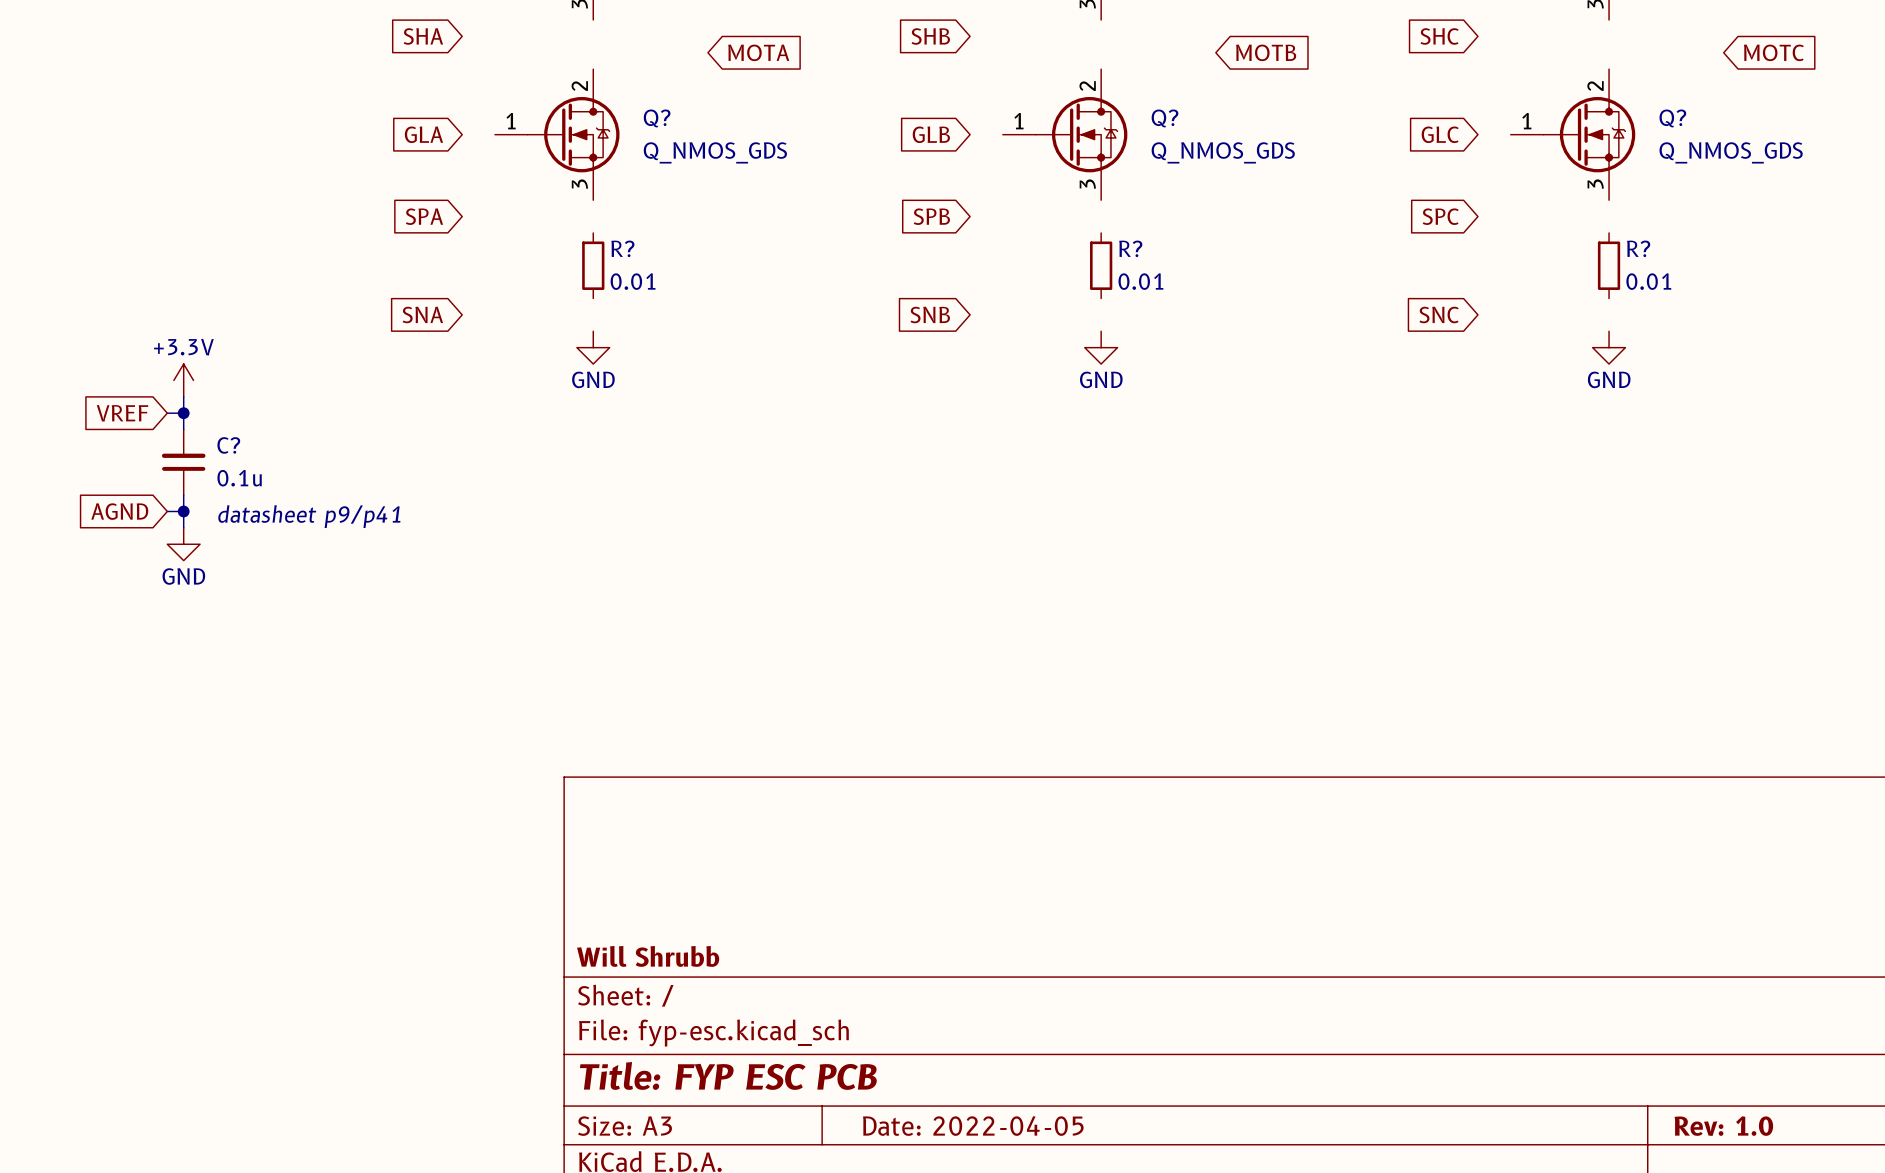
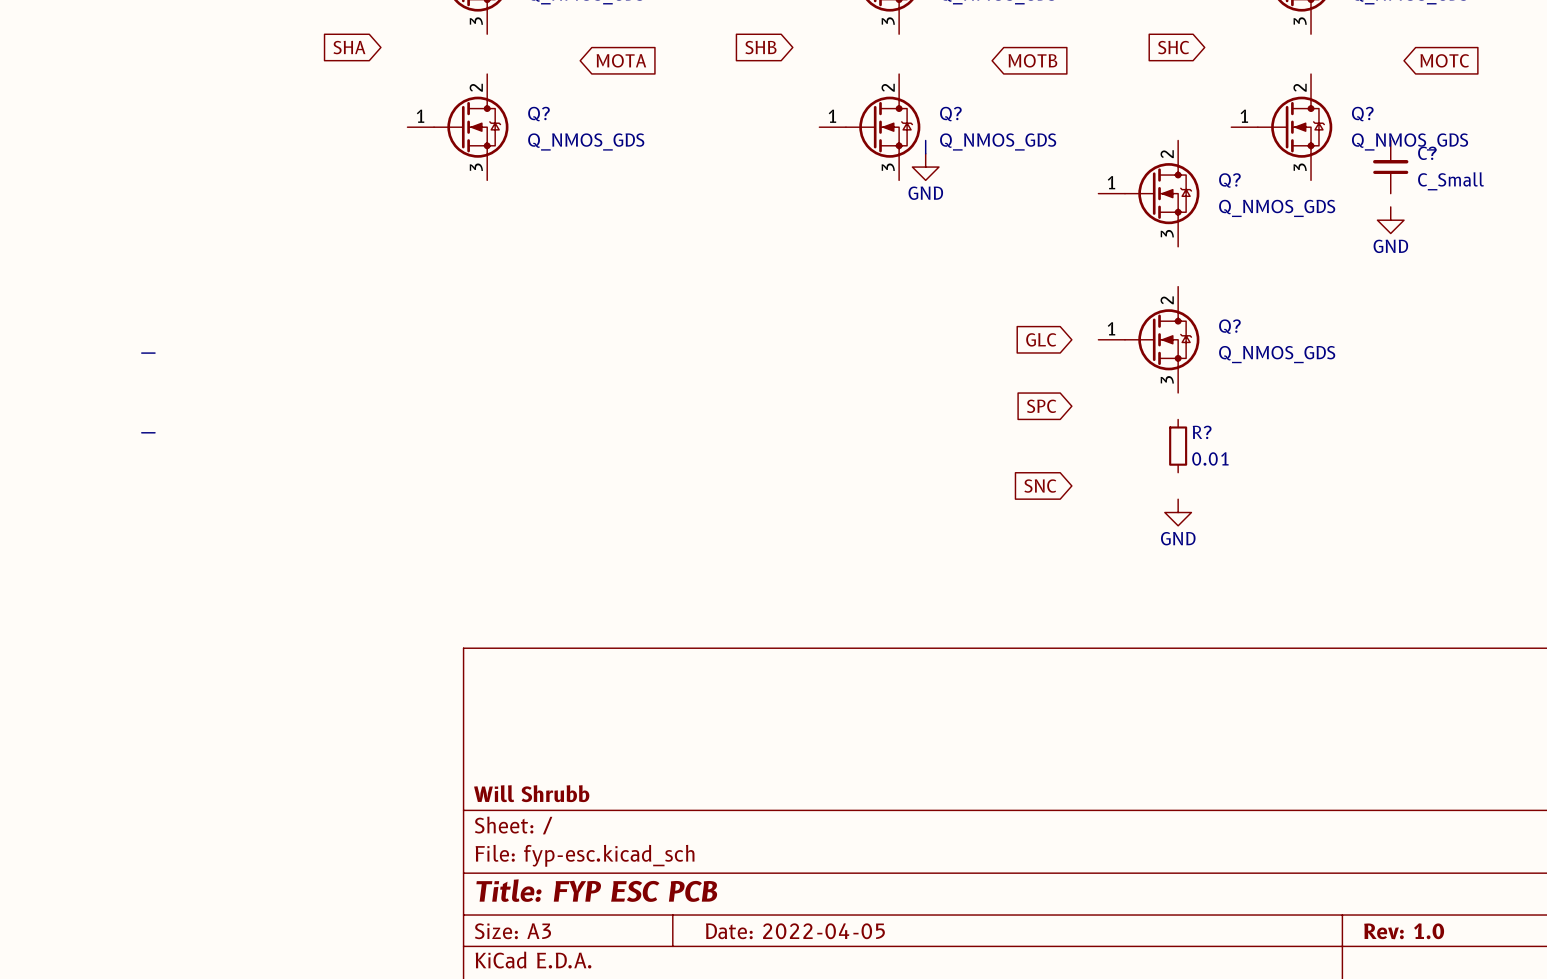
global label: GLA (423, 134) -> none
global label: GLB (931, 134) -> none
global label position: GLC (1440, 134) -> GLC (1041, 339)
wire: none -> (925, 140) (925, 153)
C?: none -> C_Small (1390, 167)
global label: SPA (424, 216) -> none
global label: SPB (931, 216) -> none
Q?: none -> Q_NMOS_GDS (1148, 193)
global label position: SPC (1440, 216) -> SPC (1041, 406)
R?: 0.01 (593, 265) -> none
R?: 0.01 (1101, 265) -> none
R?: 0.01 (1609, 265) -> none
global label: SNA (422, 314) -> none
global label: SNB (930, 314) -> none
global label position: SNC (1439, 314) -> SNC (1040, 486)
power symbol: GND (593, 347) -> none
power symbol position: GND (1101, 347) -> GND (925, 167)
power symbol position: GND (1609, 347) -> GND (1390, 220)
power symbol: +3.3V (183, 380) -> none
wire: (183, 396) (183, 429) -> none
Q?: none -> Q_NMOS_GDS (1148, 339)
global label: VREF (122, 413) -> none
junction: (183, 413) -> none
C?: 0.1u (183, 462) -> none
wire: (183, 495) (183, 527) -> none
global label: AGND (119, 511) -> none
junction: (183, 511) -> none
text: datasheet p9/p41 (309, 516) -> none
R?: none -> 0.01 (1178, 446)
power symbol: GND (183, 544) -> none
power symbol: none -> GND (1178, 512)

